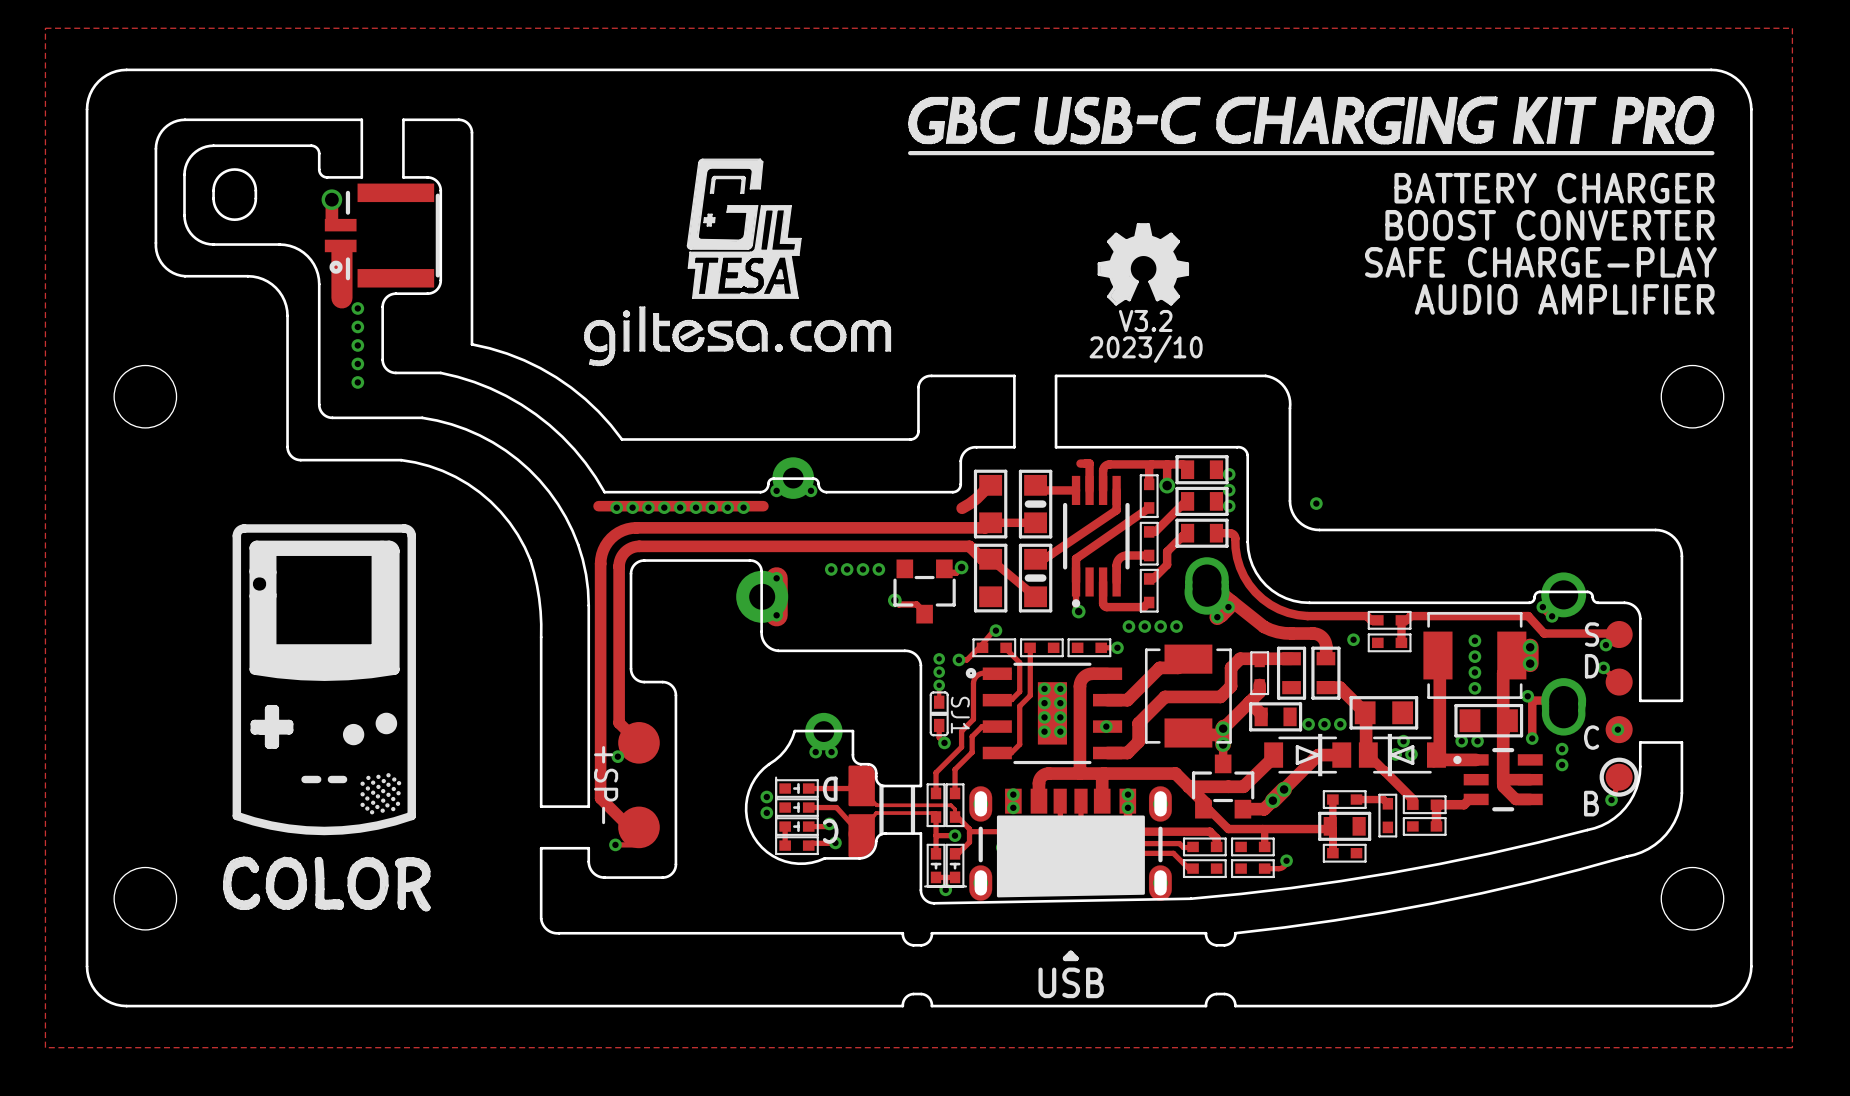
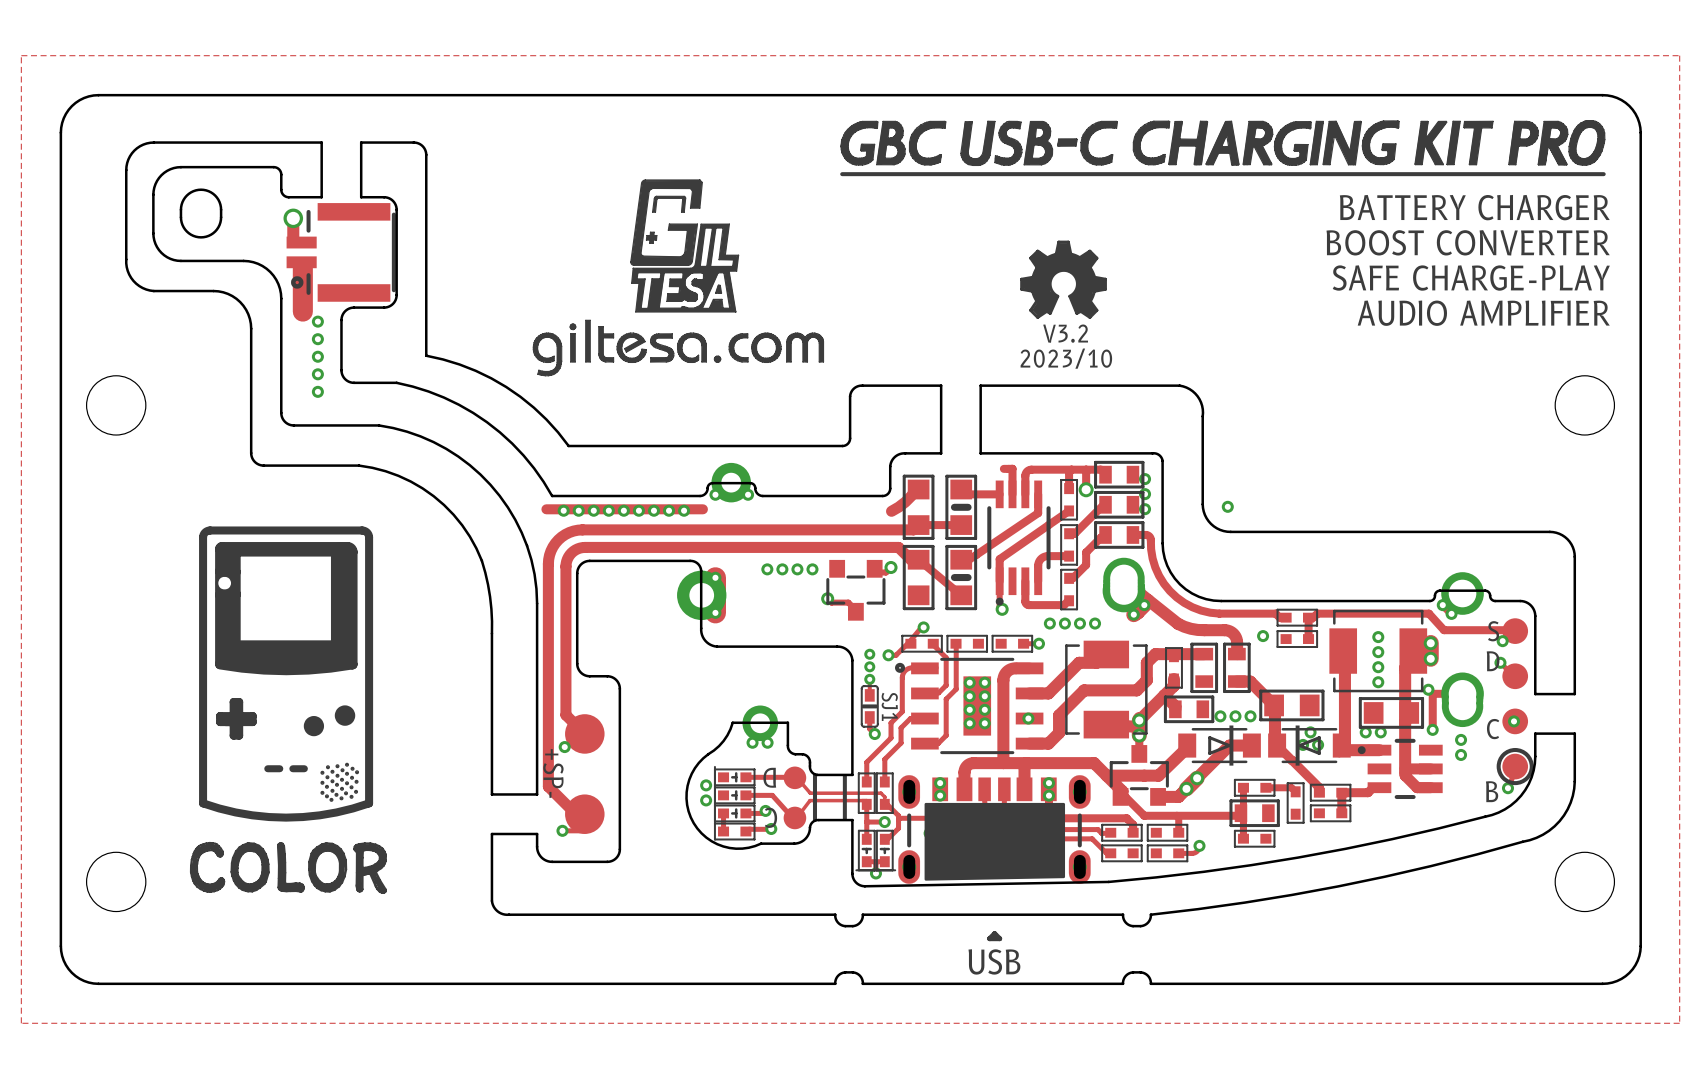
part footprint: [805, 712, 875, 858] -> [742, 705, 807, 830]

